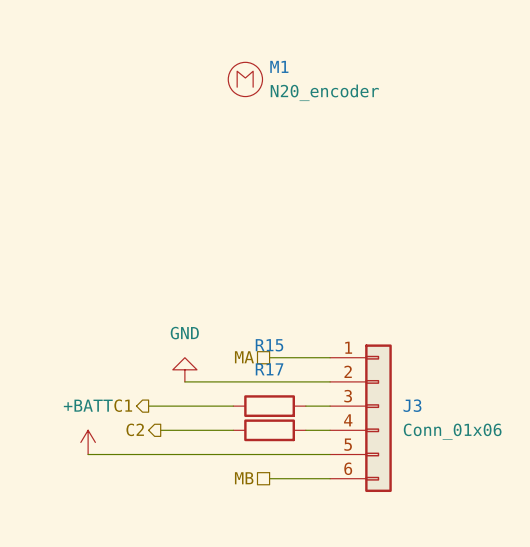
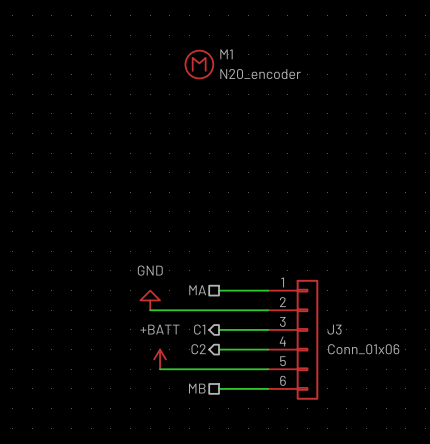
hierarchical label position: C1 (123, 405) -> C1 (199, 329)
wire: (148, 406) (233, 406) -> none
wire: none -> (219, 329) (248, 329)
R15: (269, 406) -> none
hierarchical label position: C2 (135, 429) -> C2 (198, 349)
wire: (160, 430) (233, 430) -> none
wire: none -> (219, 349) (248, 349)
R17: (269, 430) -> none
power symbol position: +BATT (88, 442) -> +BATT (160, 359)
wire: (88, 454) (196, 454) -> none

